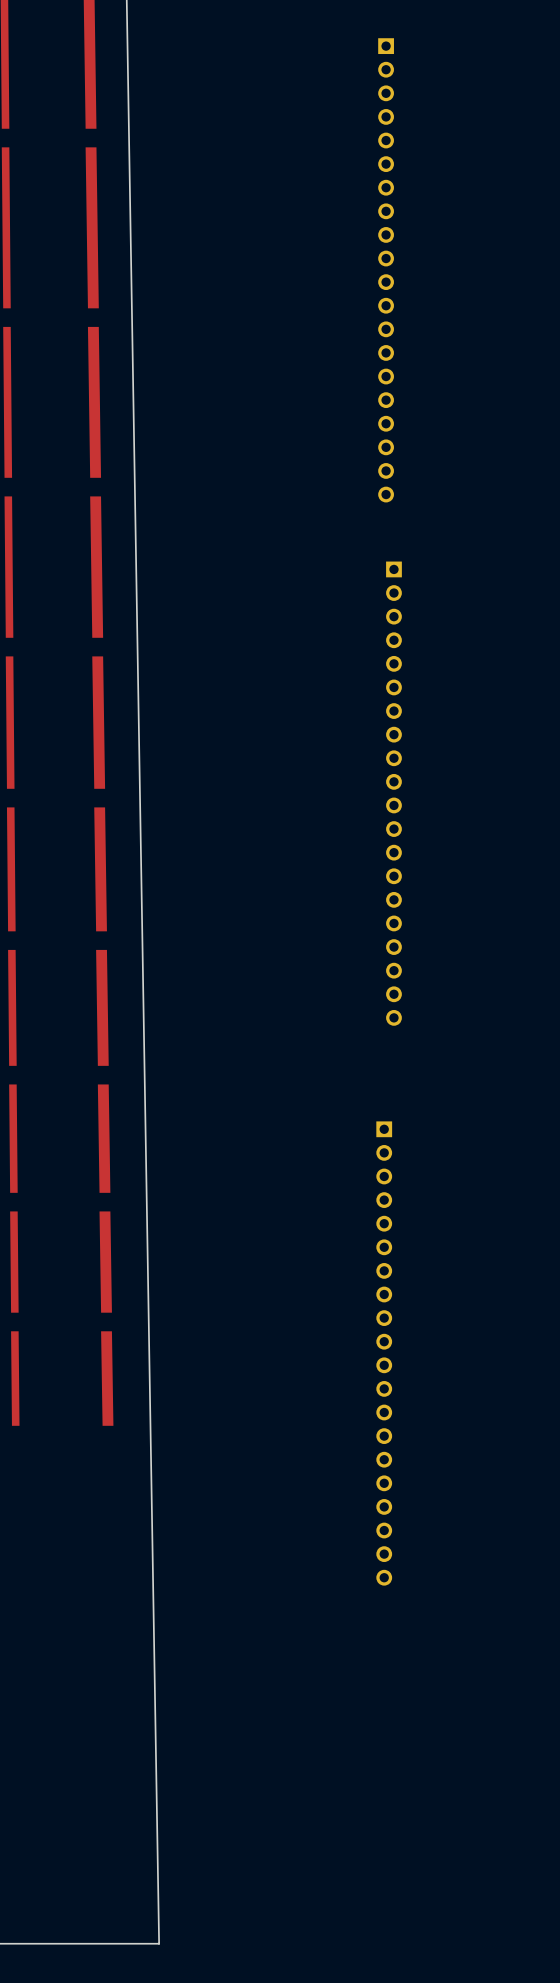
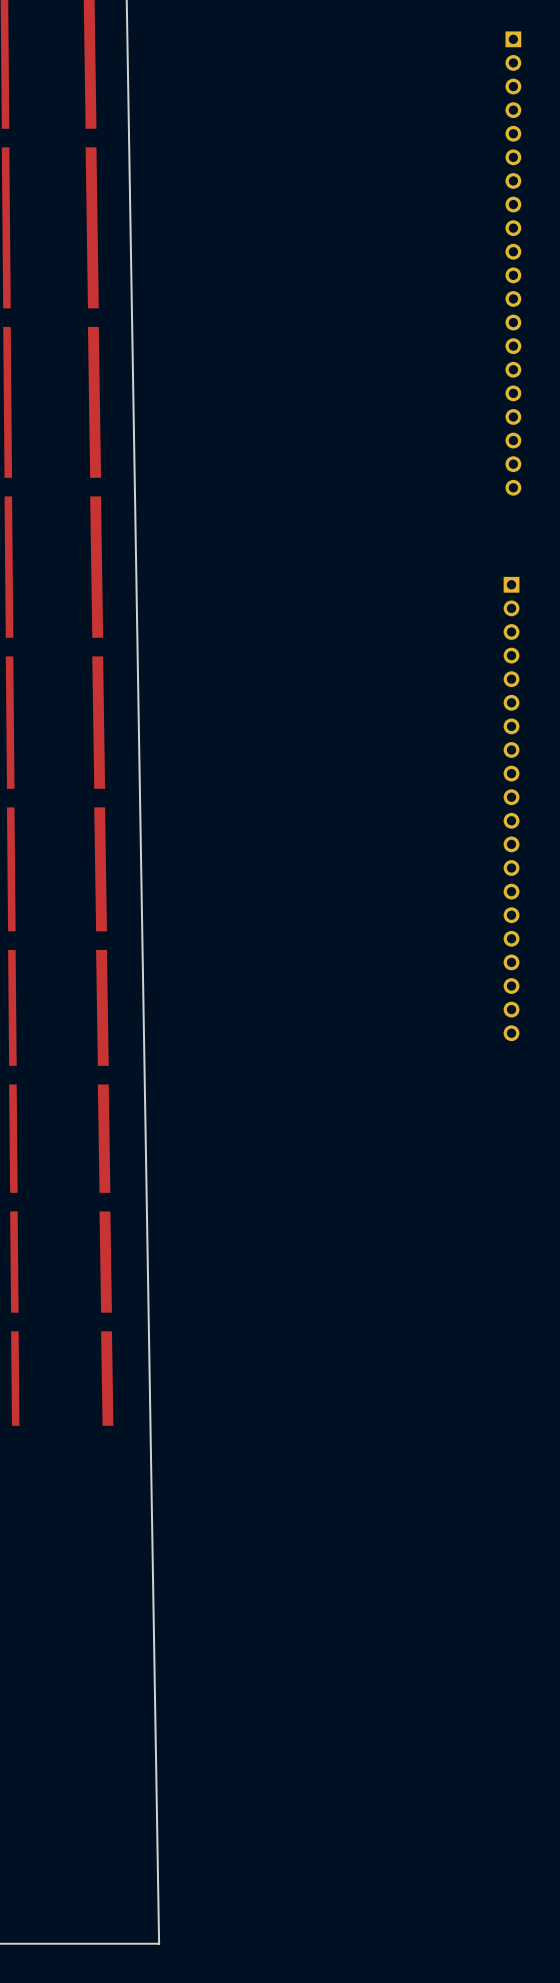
part position: (386, 270) -> (513, 263)
part position: (393, 793) -> (511, 808)
part: (384, 1353) -> none

